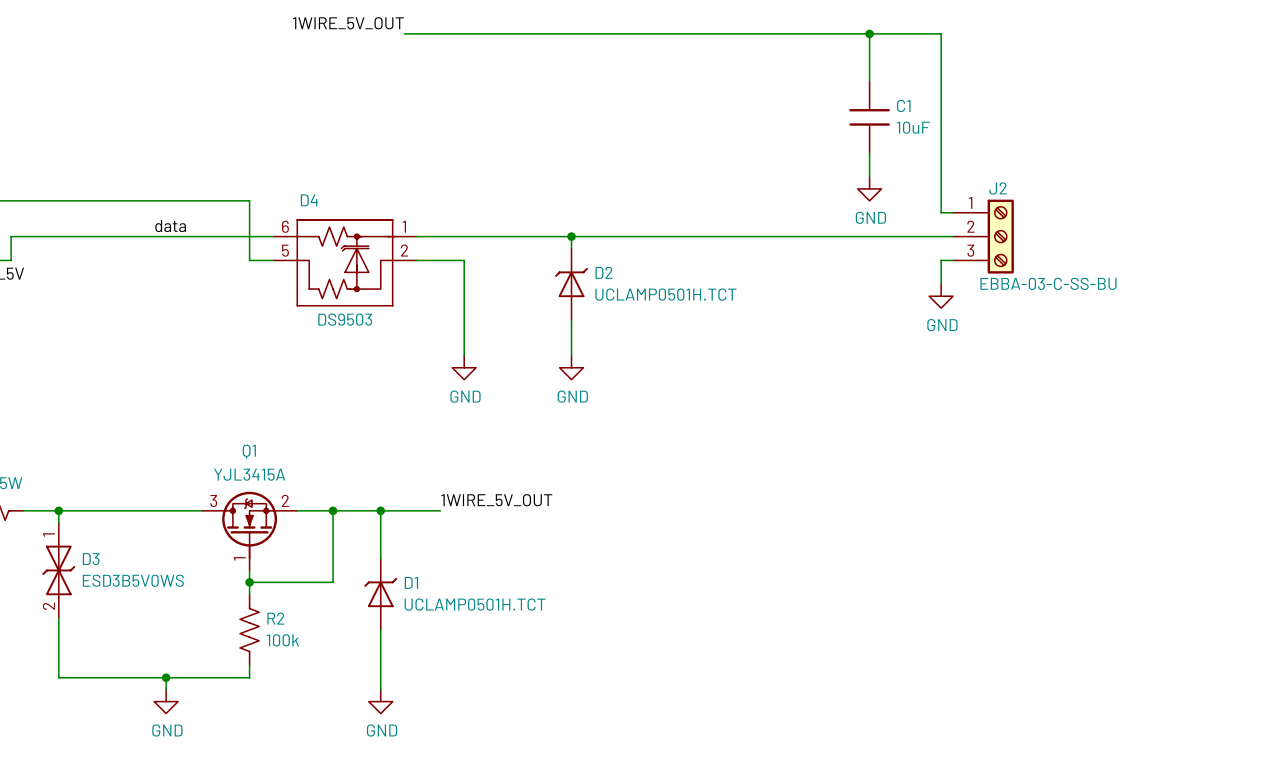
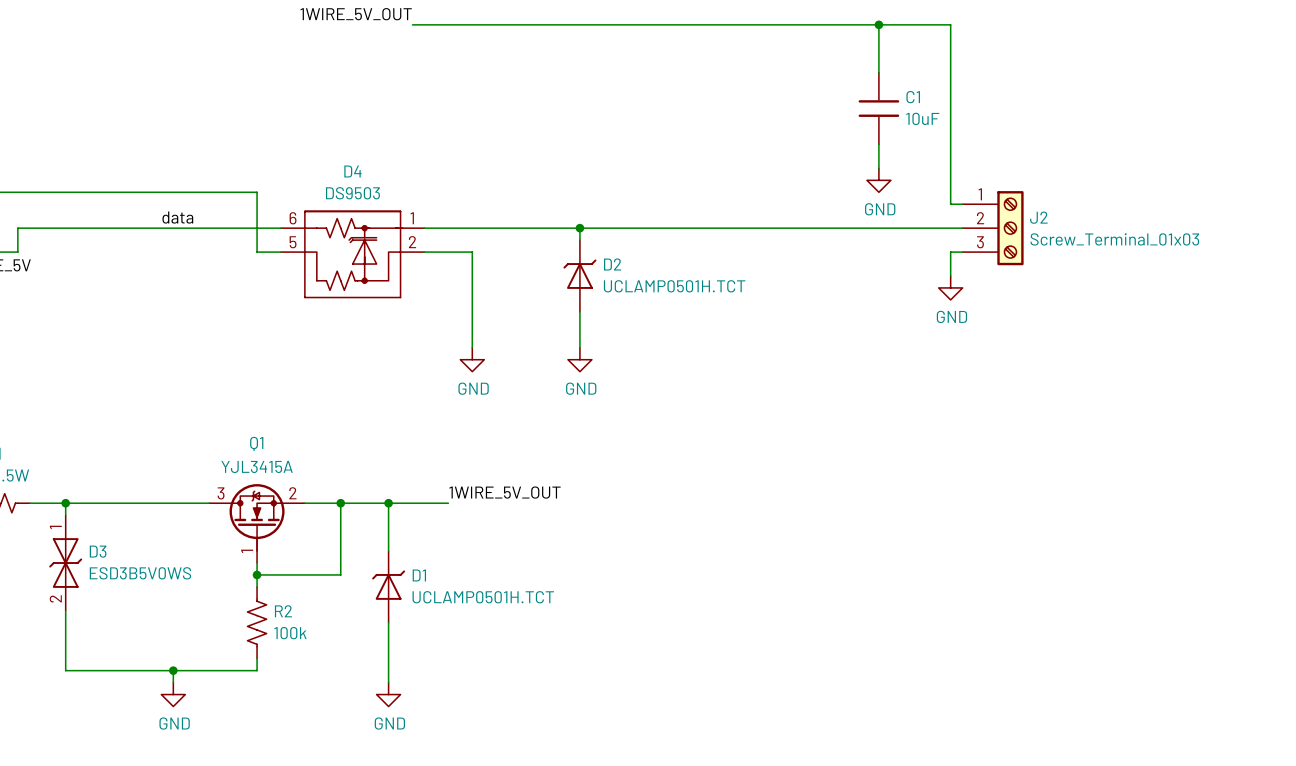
J2 name position: J2 (998, 188) -> J2 (1038, 217)
D4 name position: D4 (309, 200) -> D4 (352, 171)
J2 value: EBBA-03-C-SS-BU (1048, 283) -> Screw_Terminal_01x03 (1114, 239)
D4 value position: DS9503 (345, 319) -> DS9503 (352, 193)

